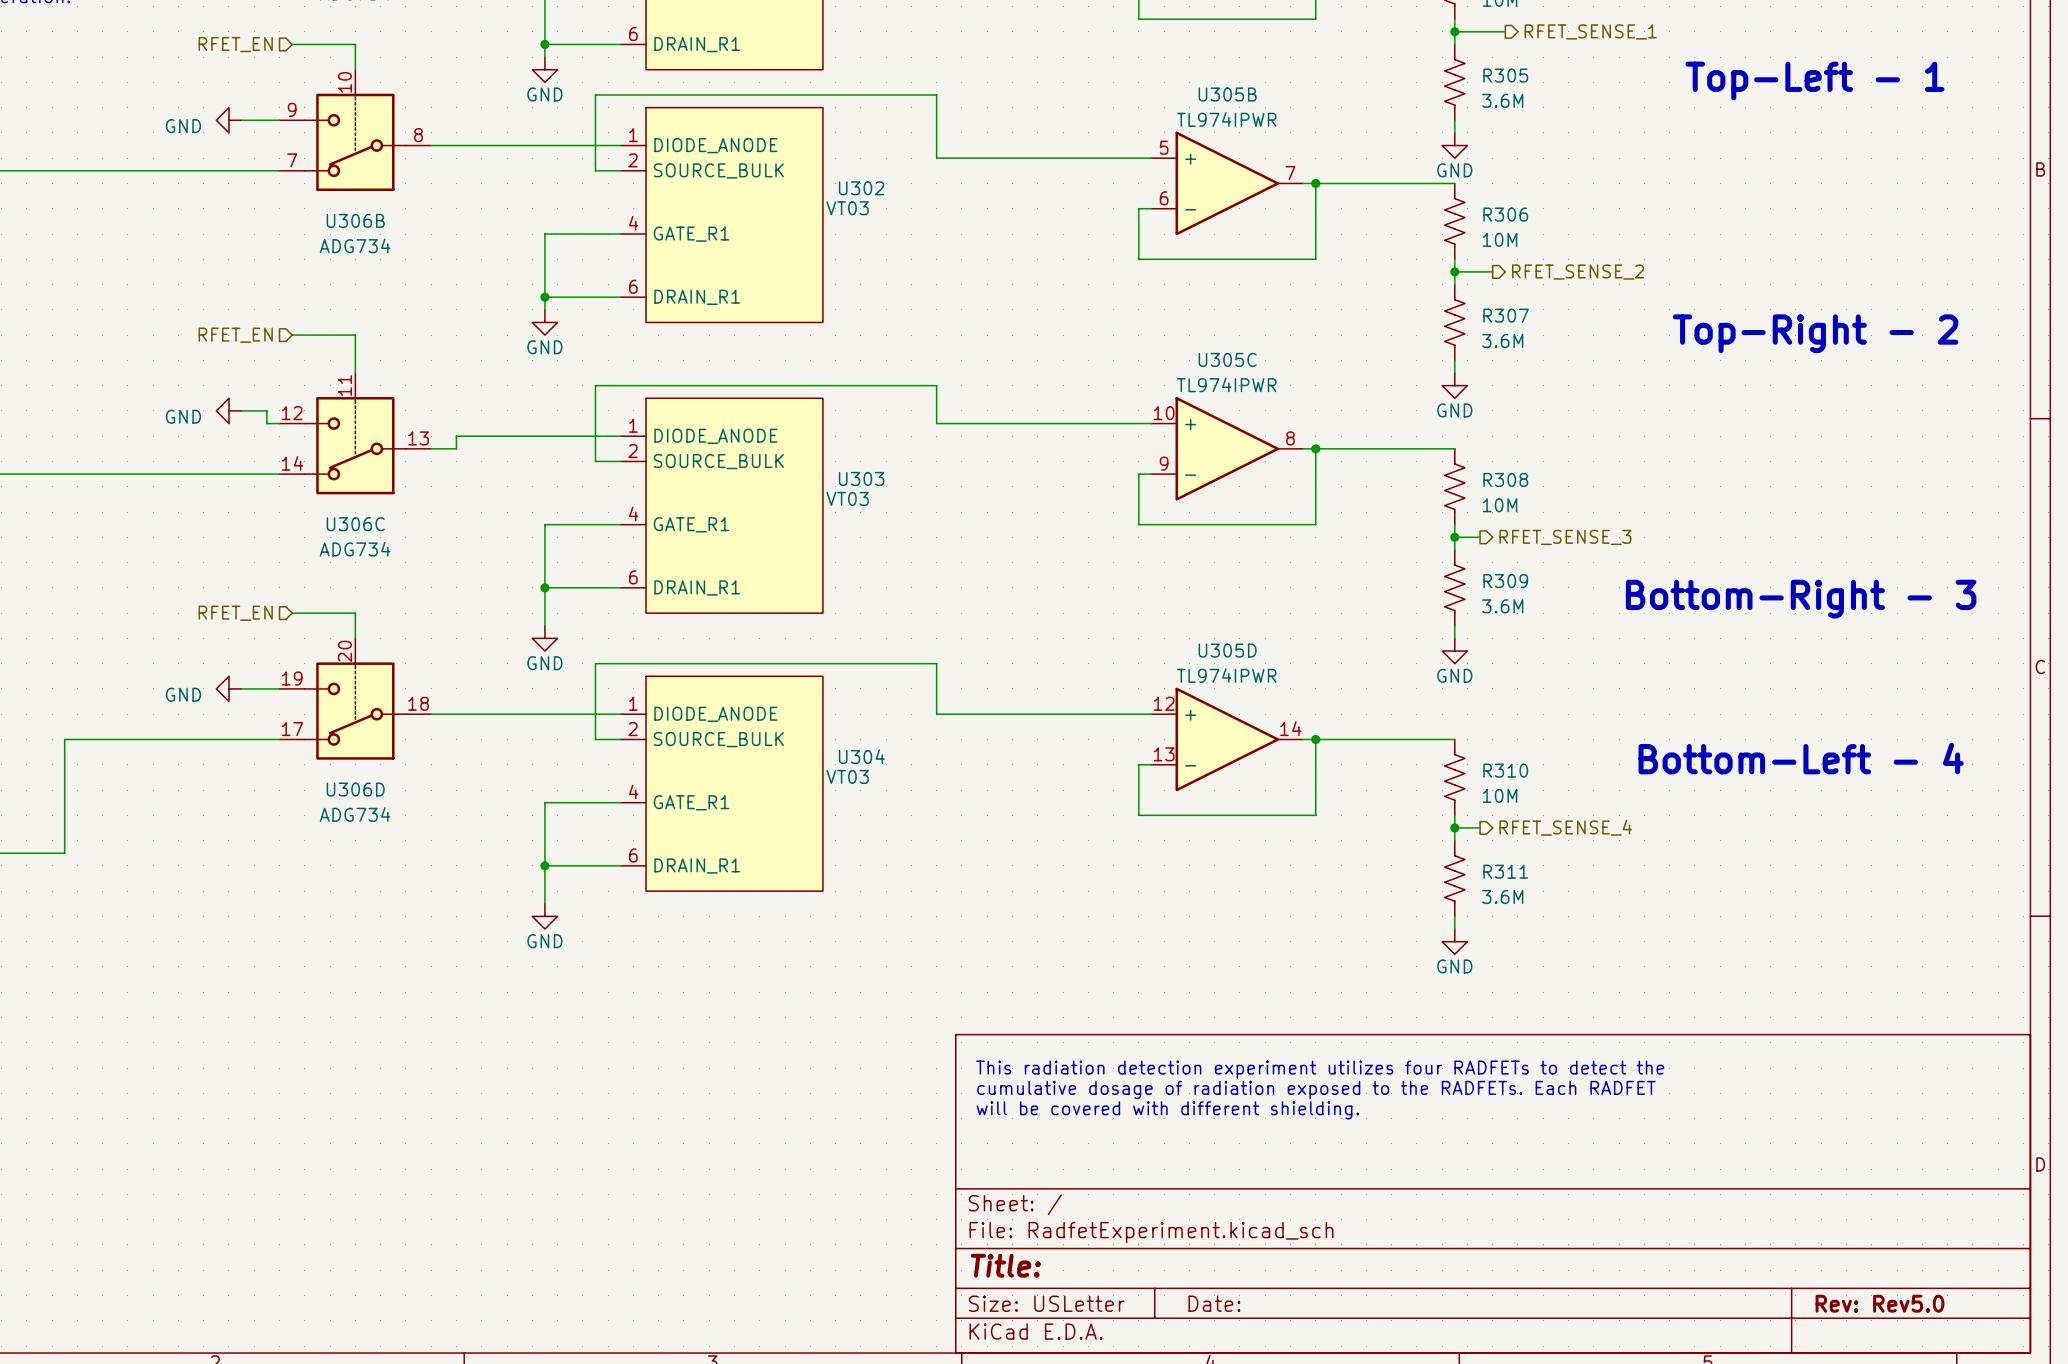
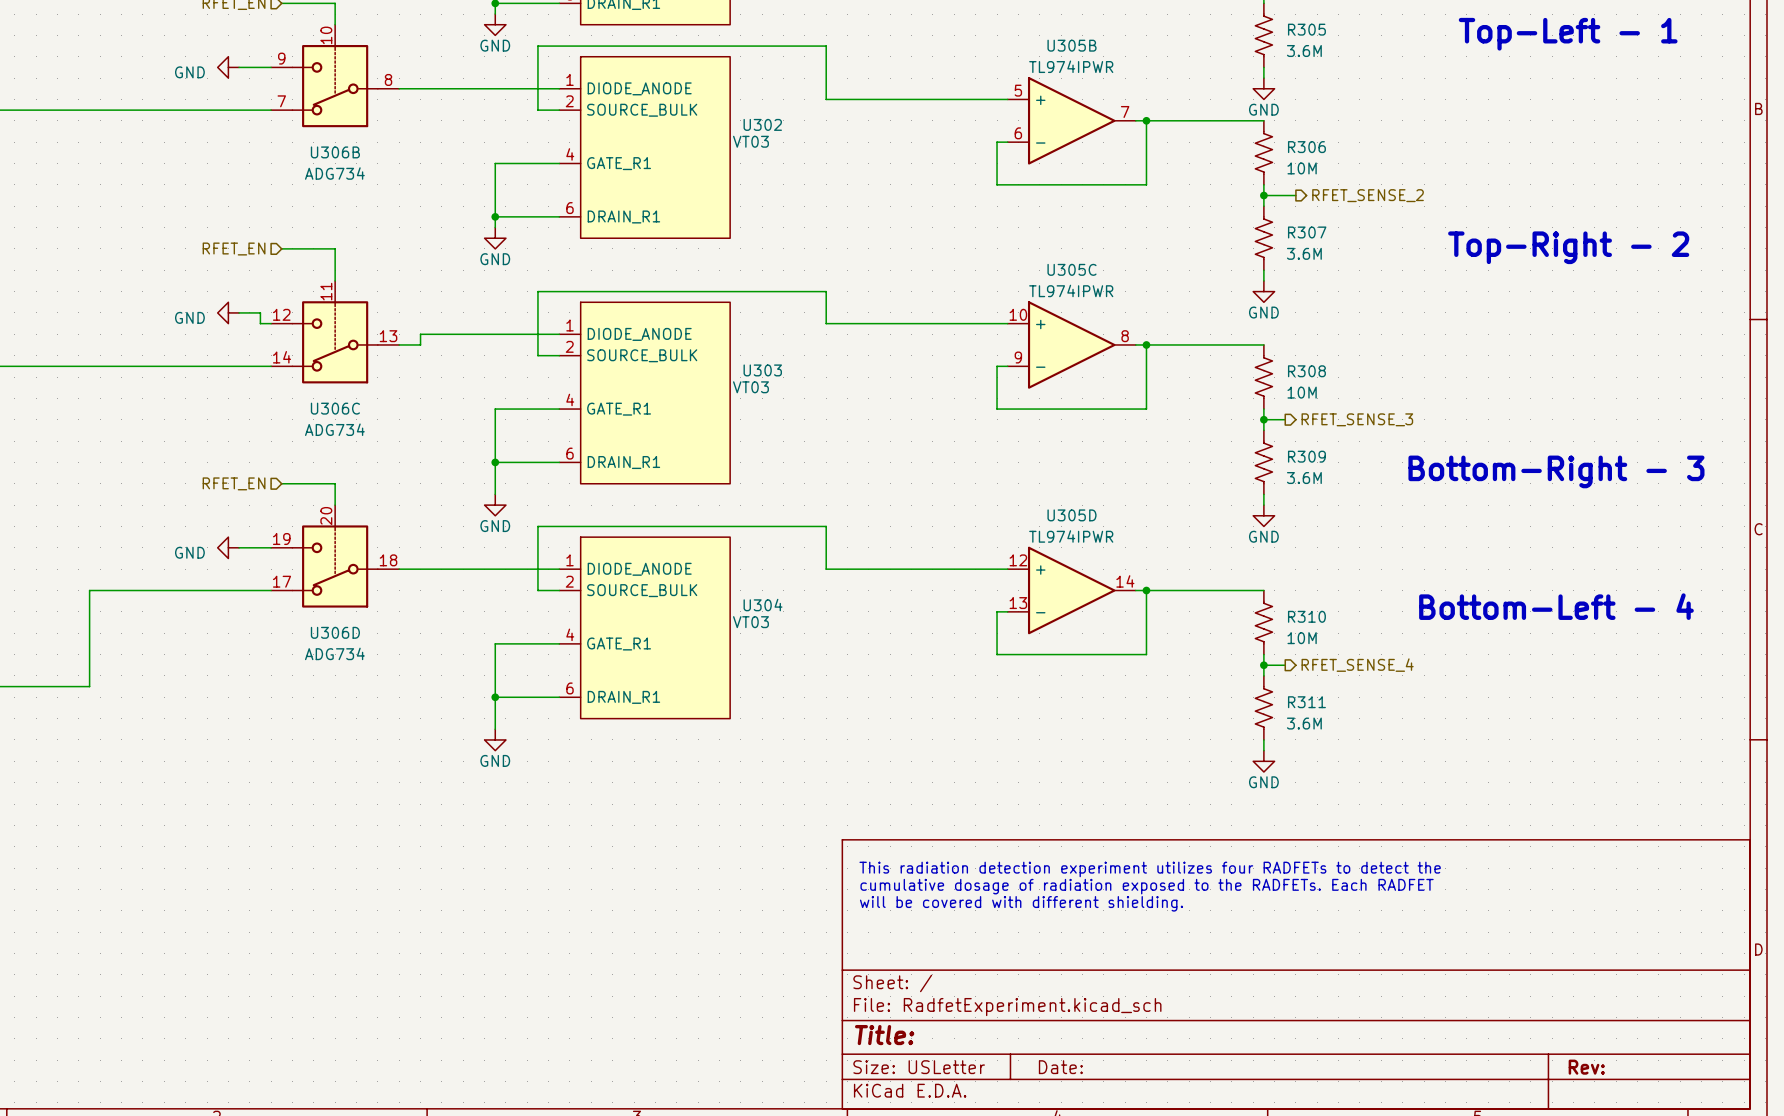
title block: Rev: Rev5.0 (1879, 1303) -> Rev: (1586, 1067)

